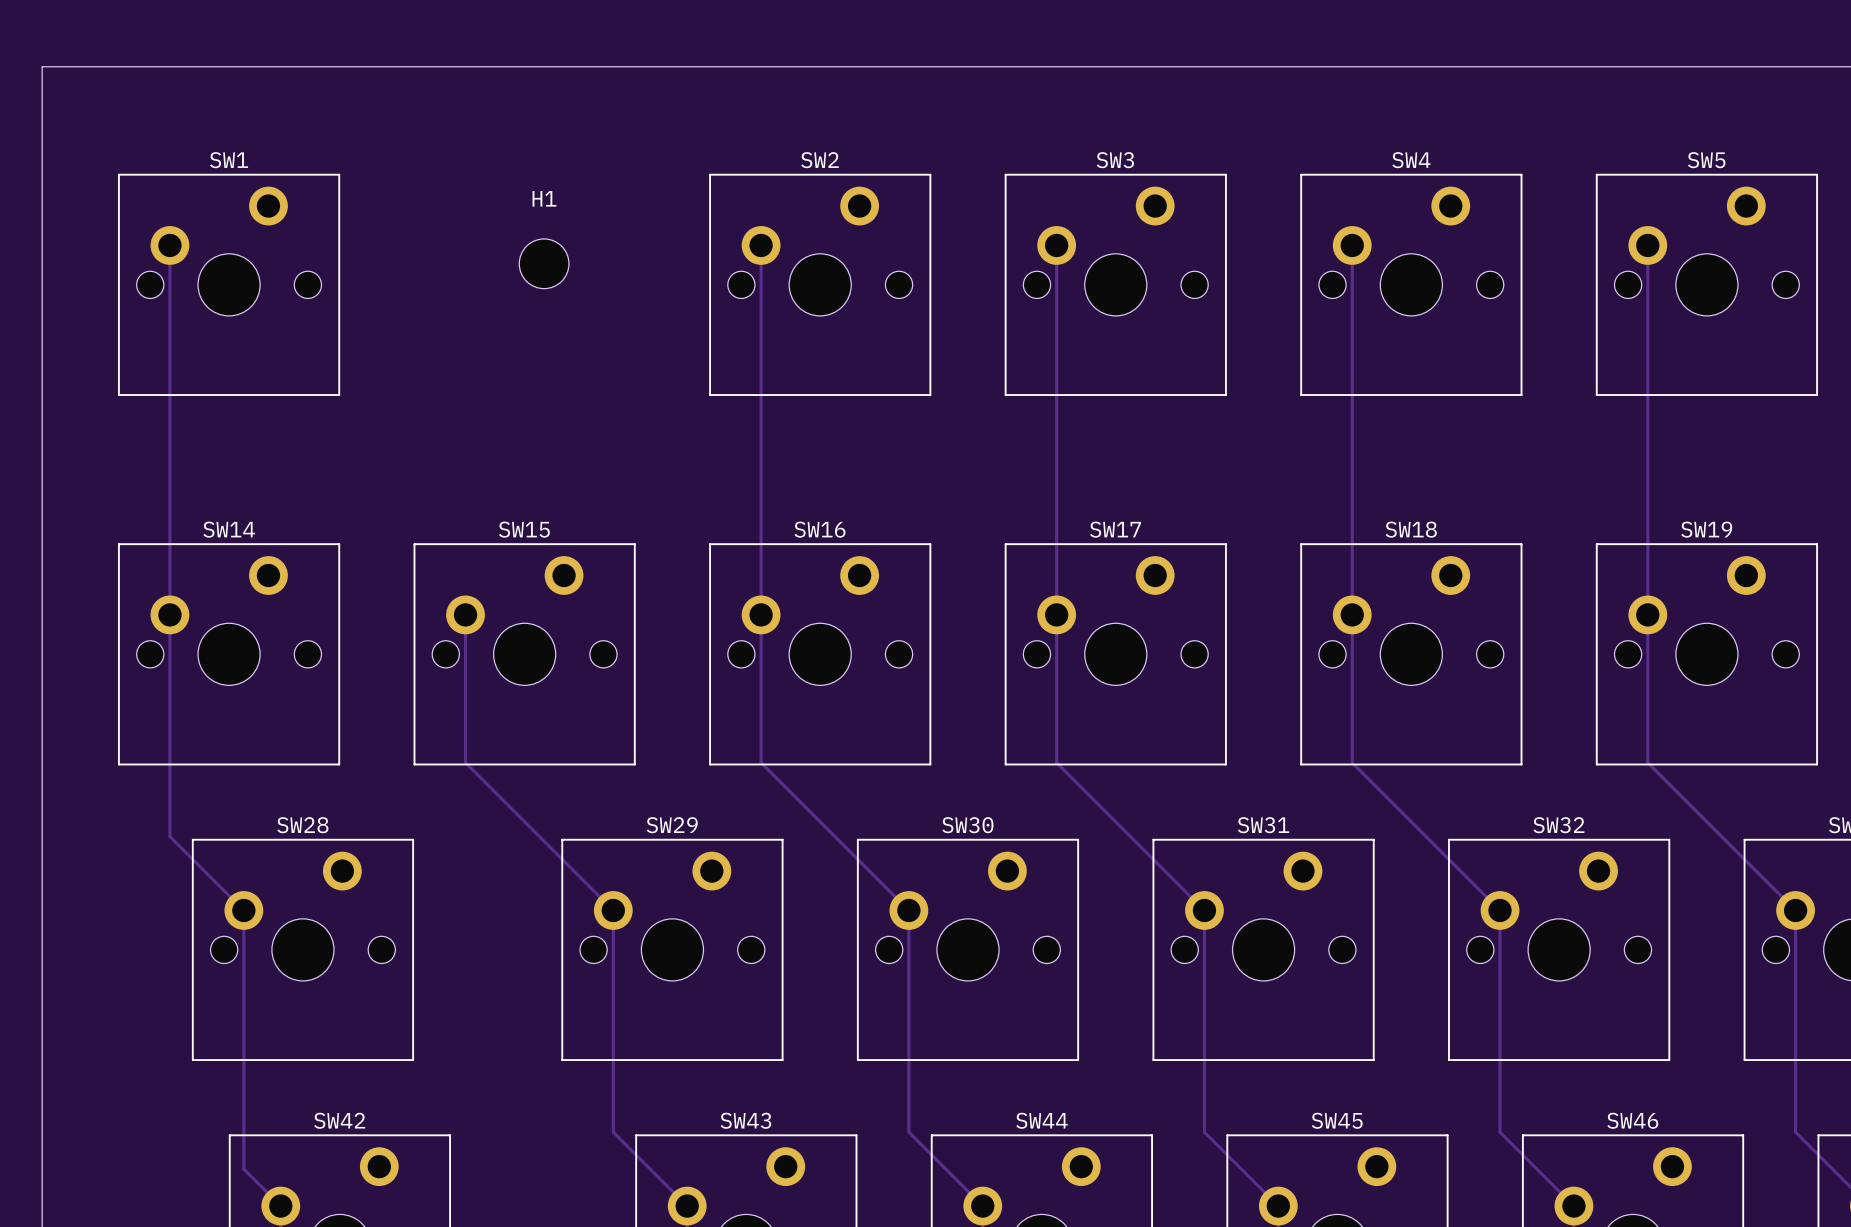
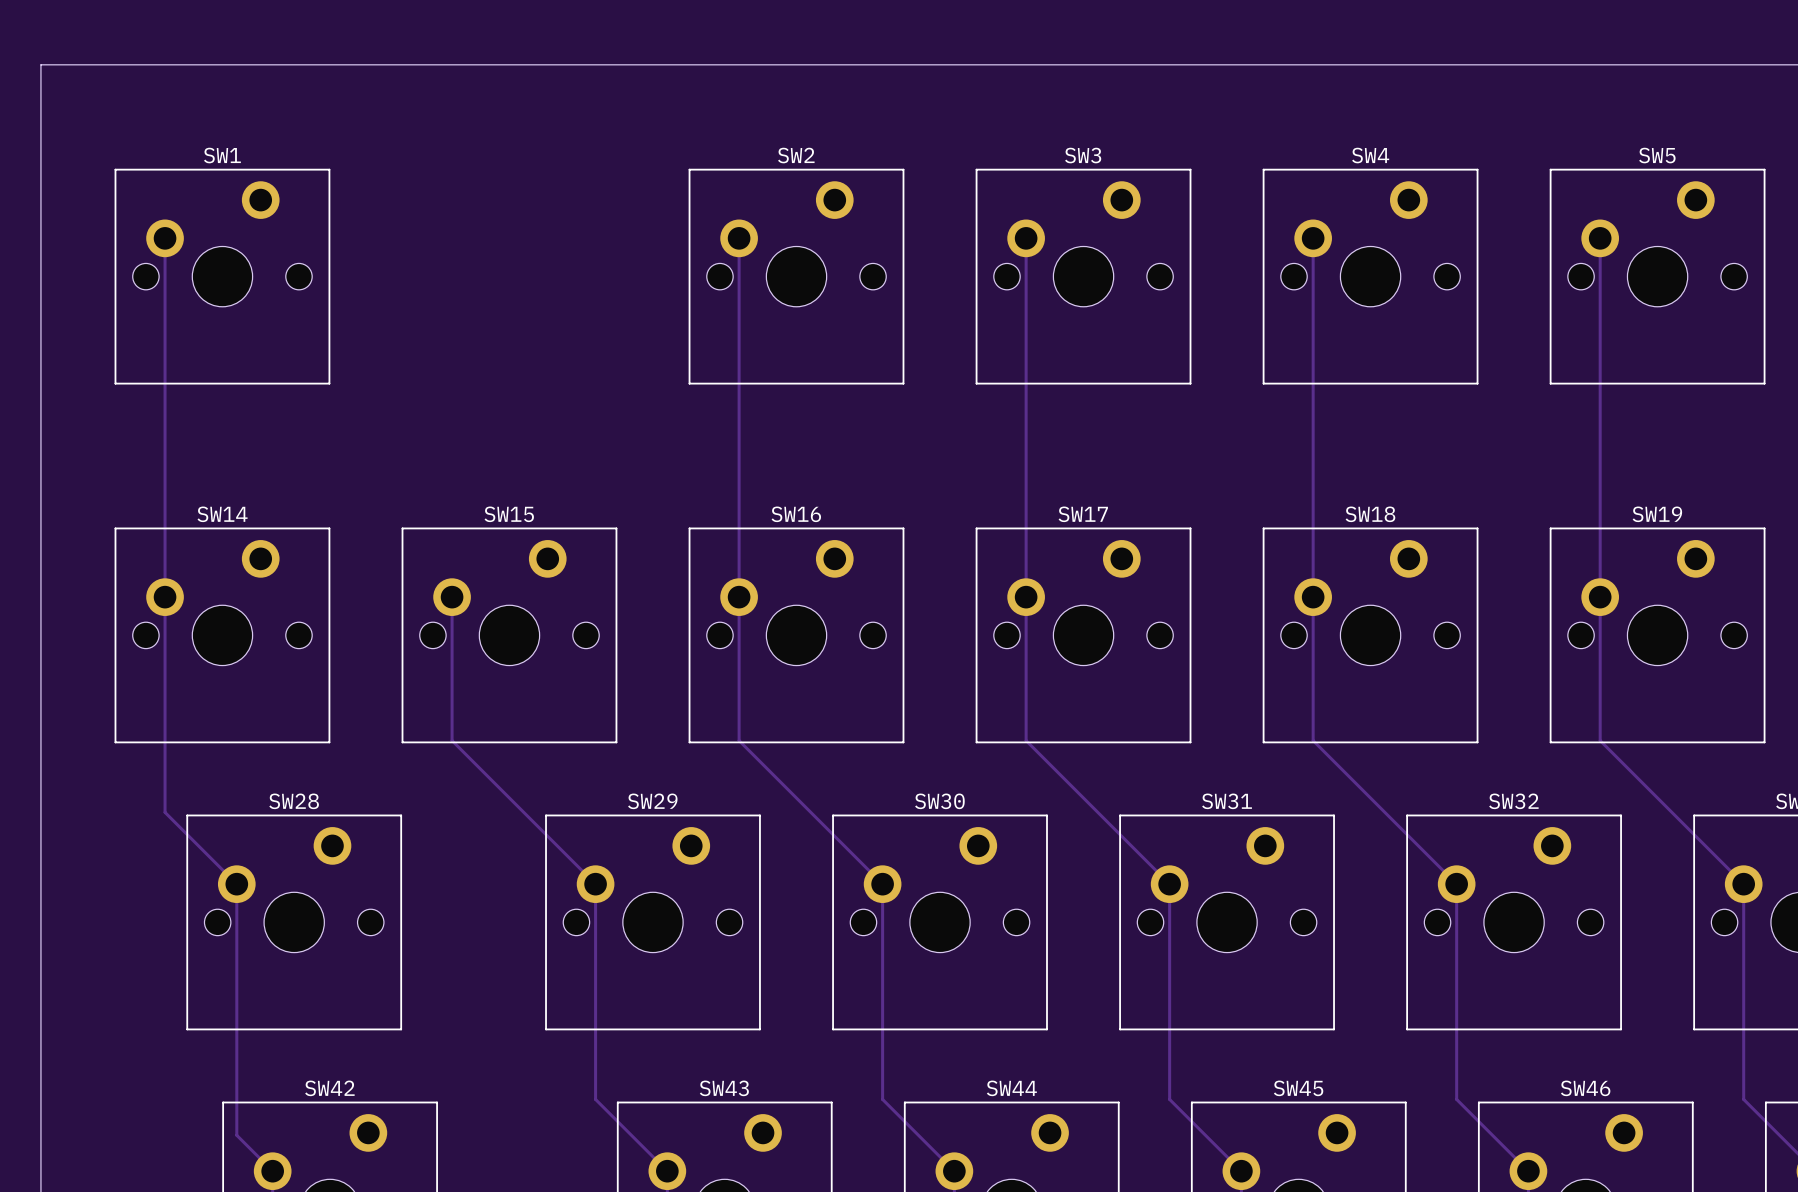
H1: (544, 263) -> none

